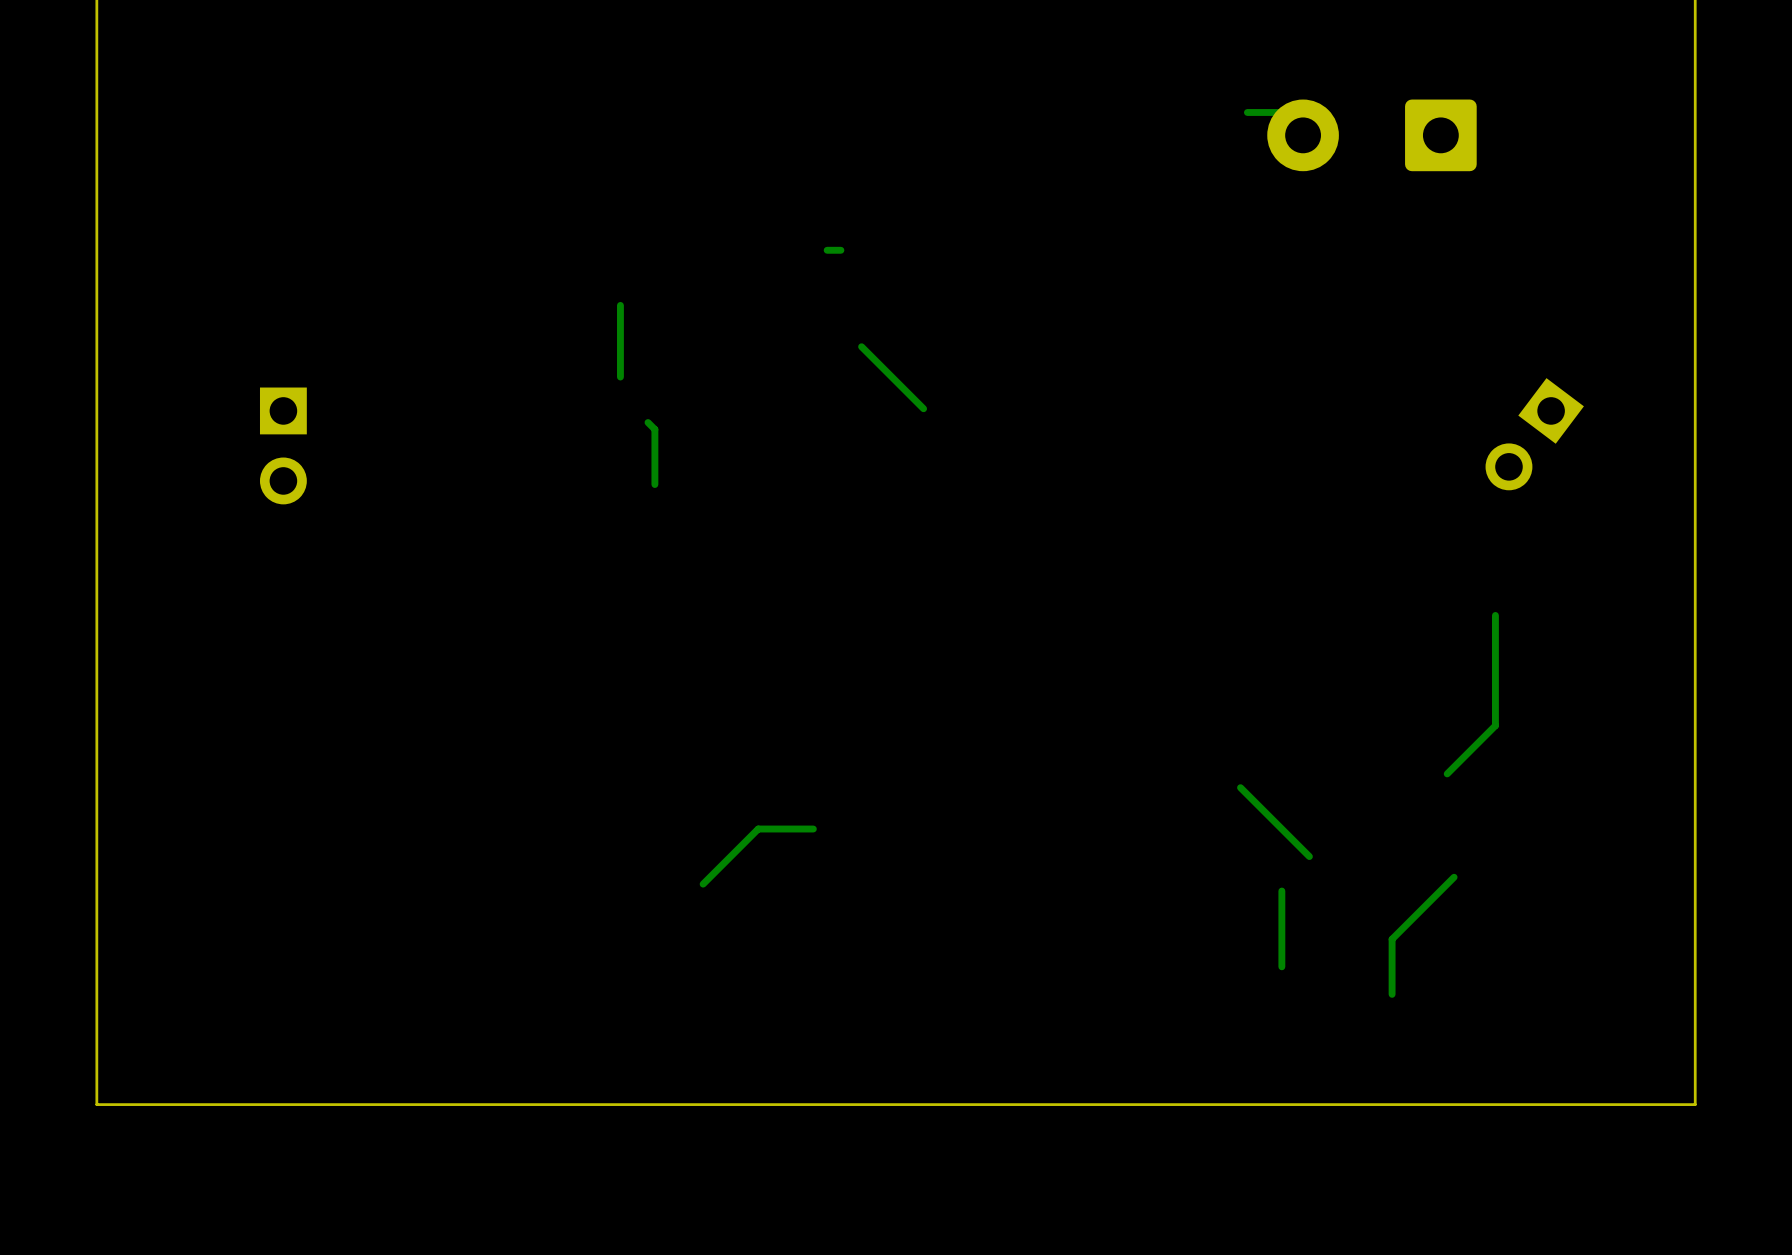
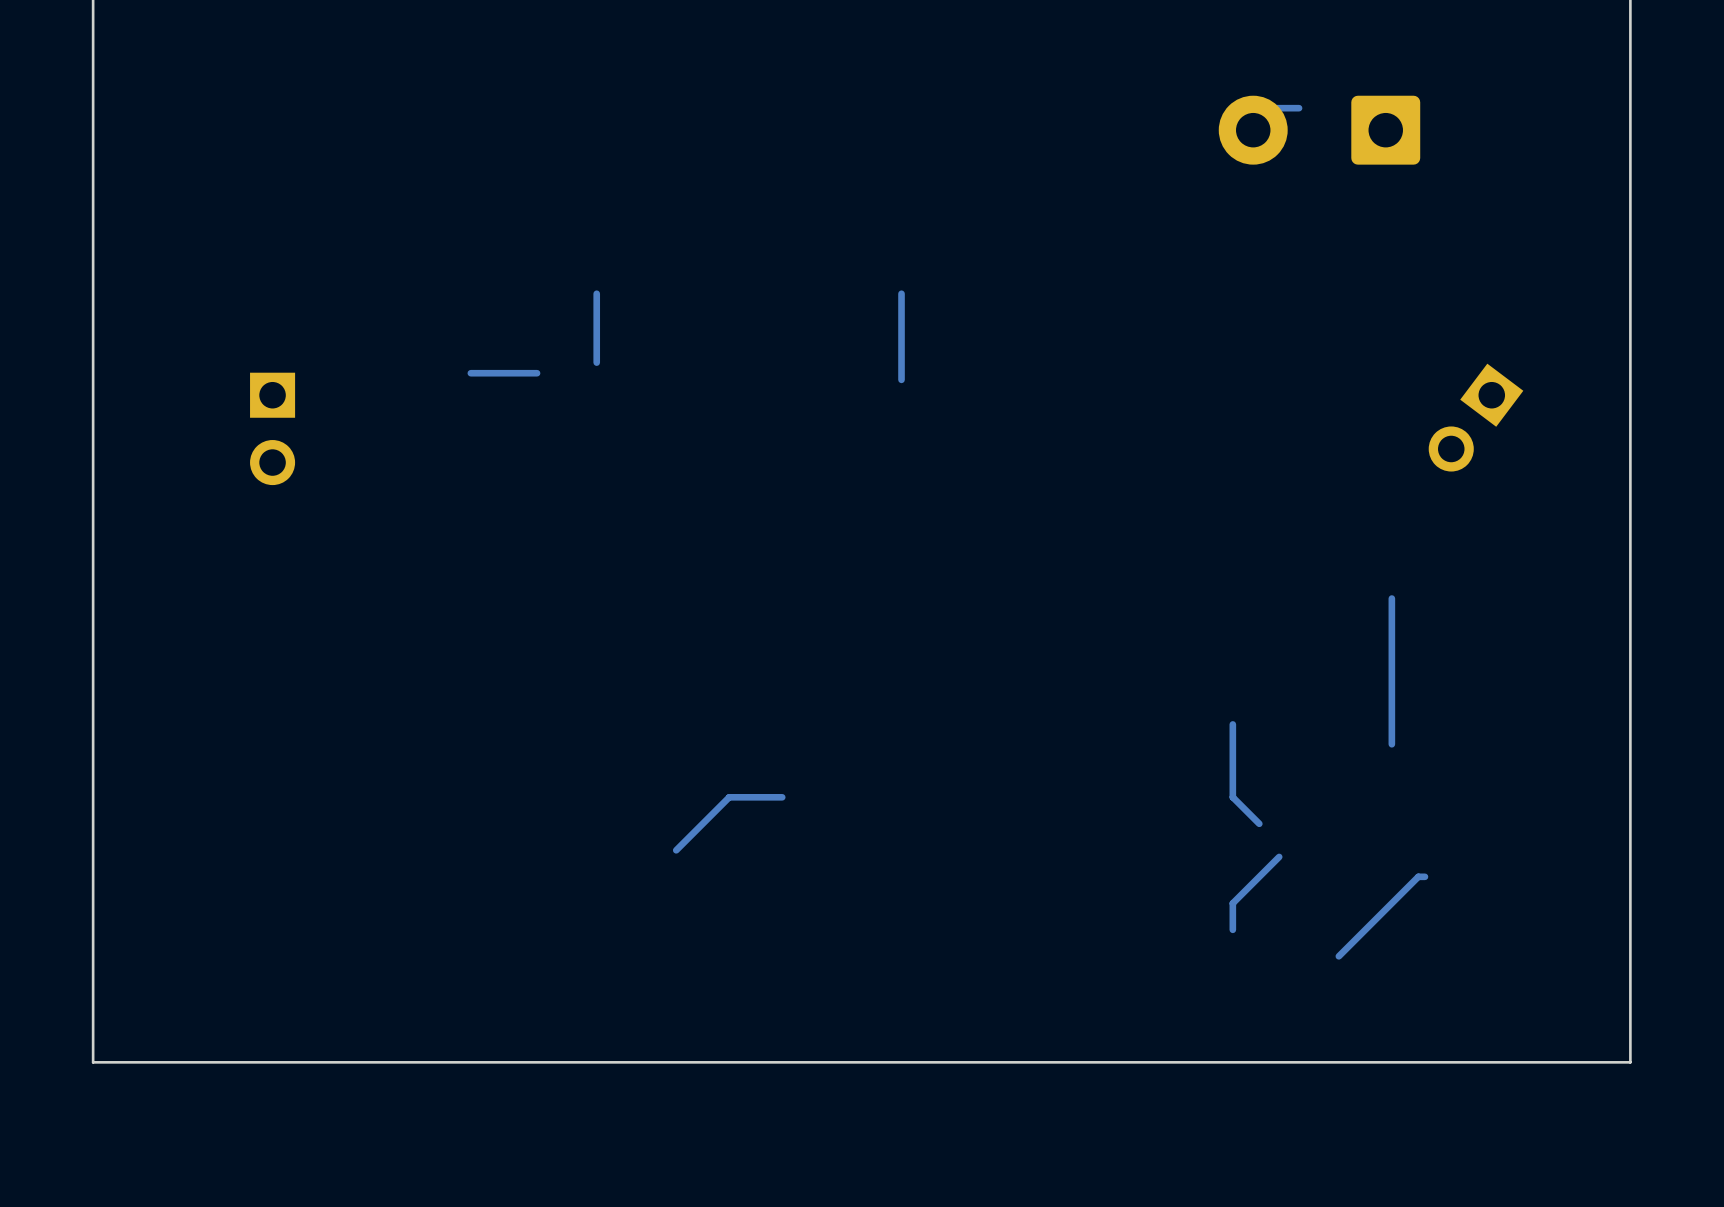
track: (1309, 112) (1247, 112) -> (1259, 108) (1299, 108)
track: (840, 250) (827, 250) -> none
track: none -> (901, 293) (901, 379)
track: (861, 346) (923, 408) -> none
track: none -> (537, 373) (470, 373)
track: (648, 422) (654, 429) (654, 484) -> none
track: (1495, 615) (1495, 725) (1447, 773) -> (1391, 598) (1391, 744)
track: (1240, 787) (1281, 829) -> (1232, 724) (1232, 797)
track: (1454, 877) (1392, 939) (1392, 994) -> (1424, 876) (1418, 876) (1338, 956)
track: (1281, 891) (1281, 939) -> (1279, 856) (1232, 903)

